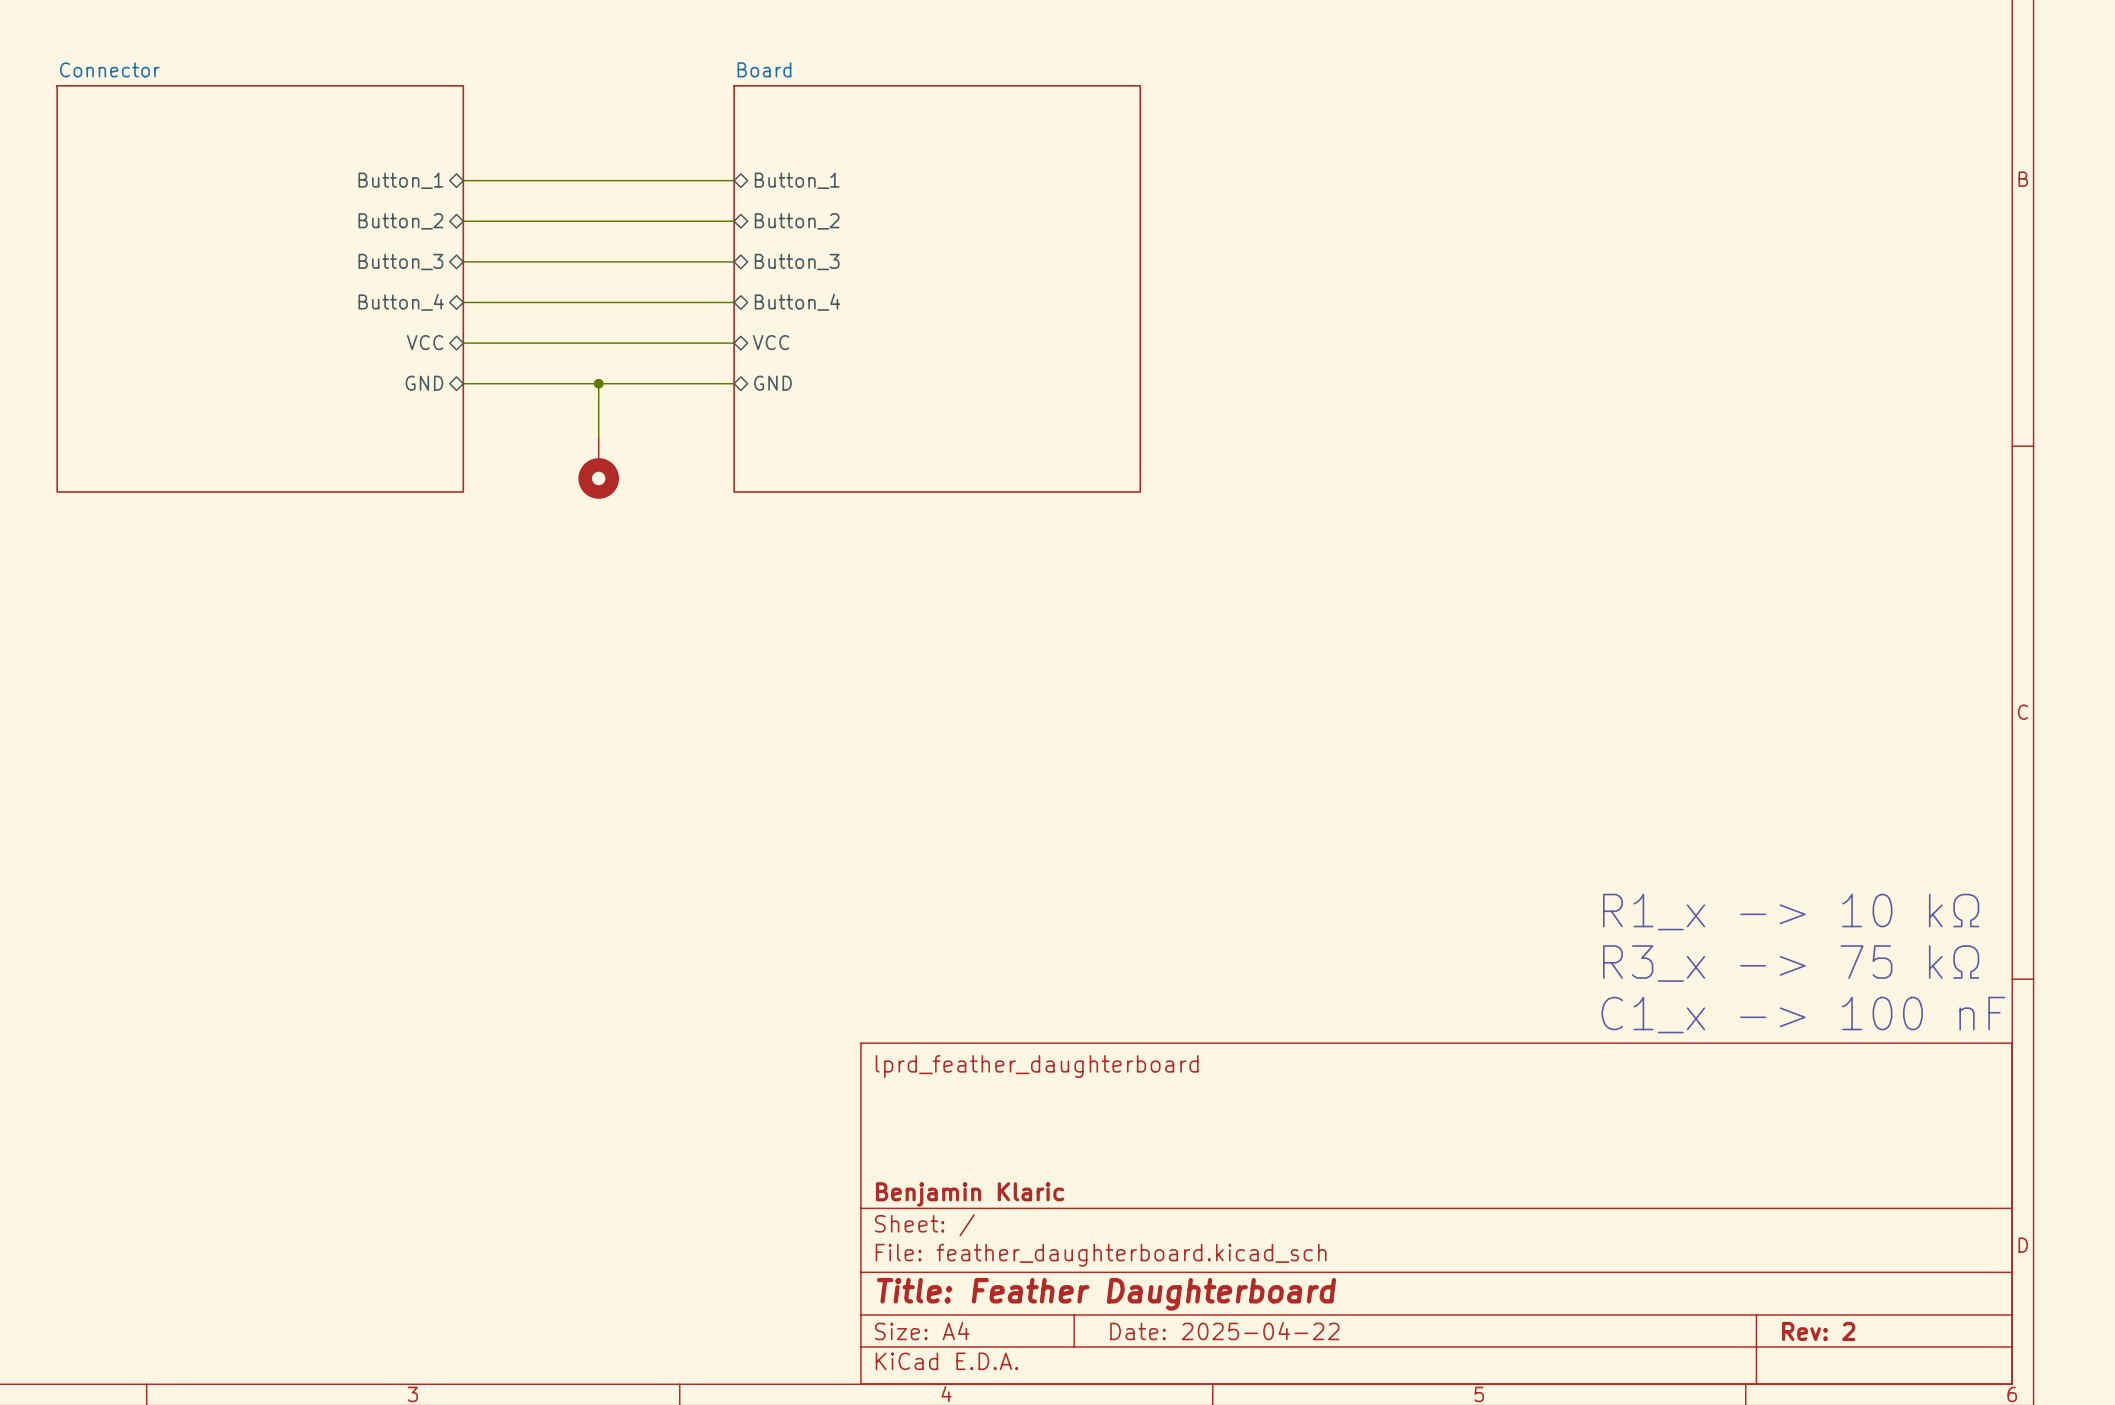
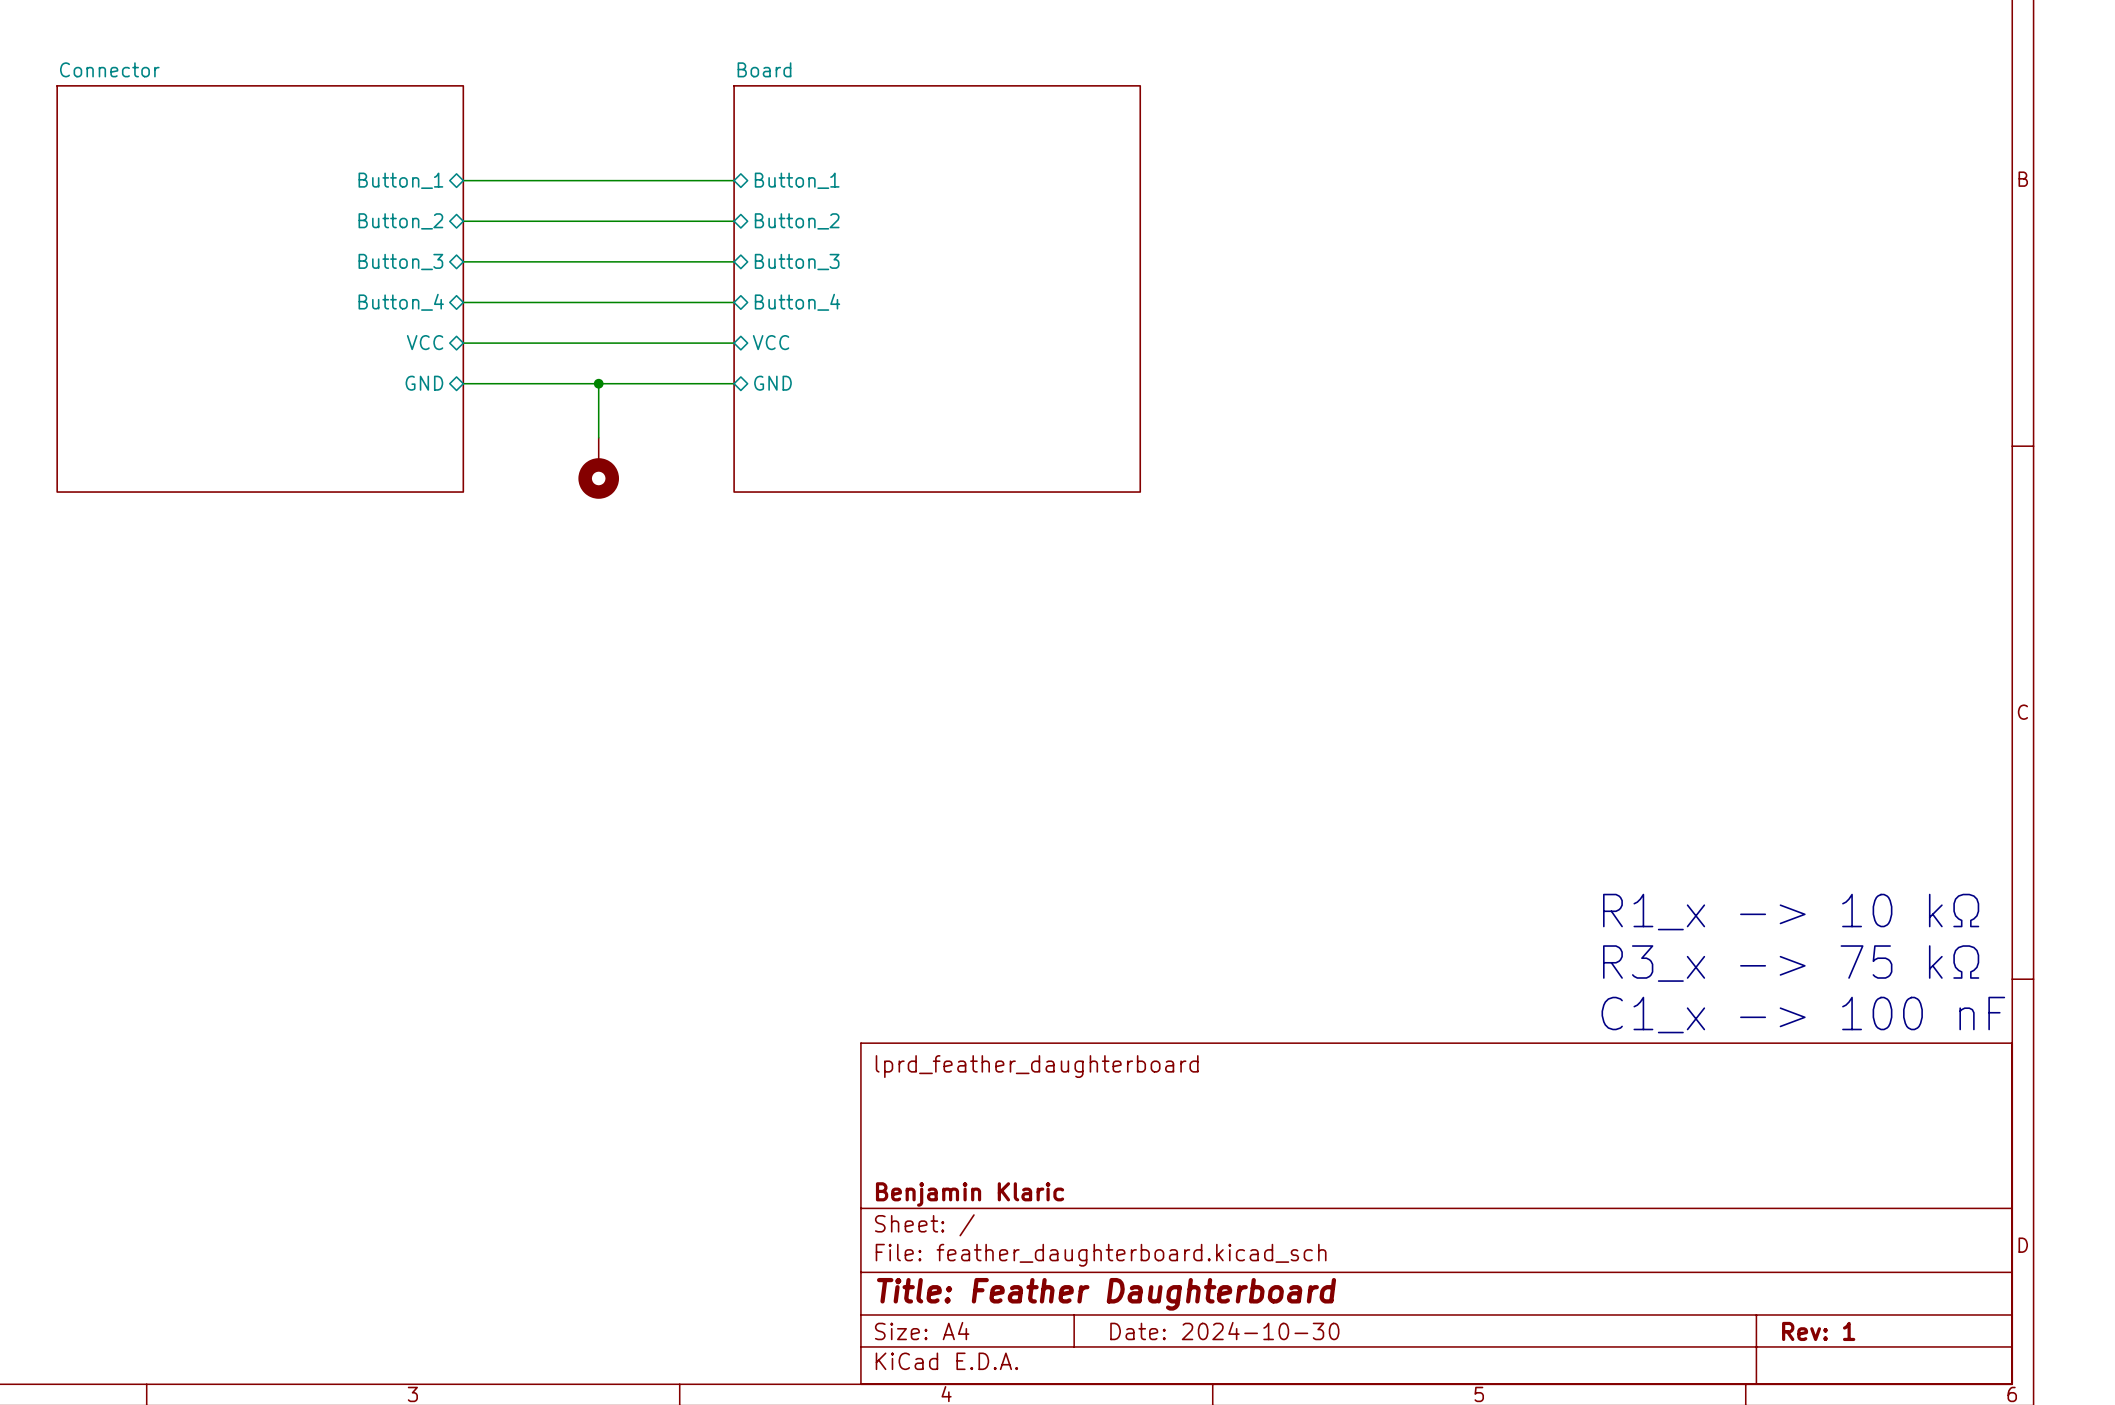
title block: Date: 2025-04-22 (1224, 1331) -> Date: 2024-10-30 (1224, 1331)
title block: Rev: 2 (1818, 1331) -> Rev: 1 (1818, 1331)

